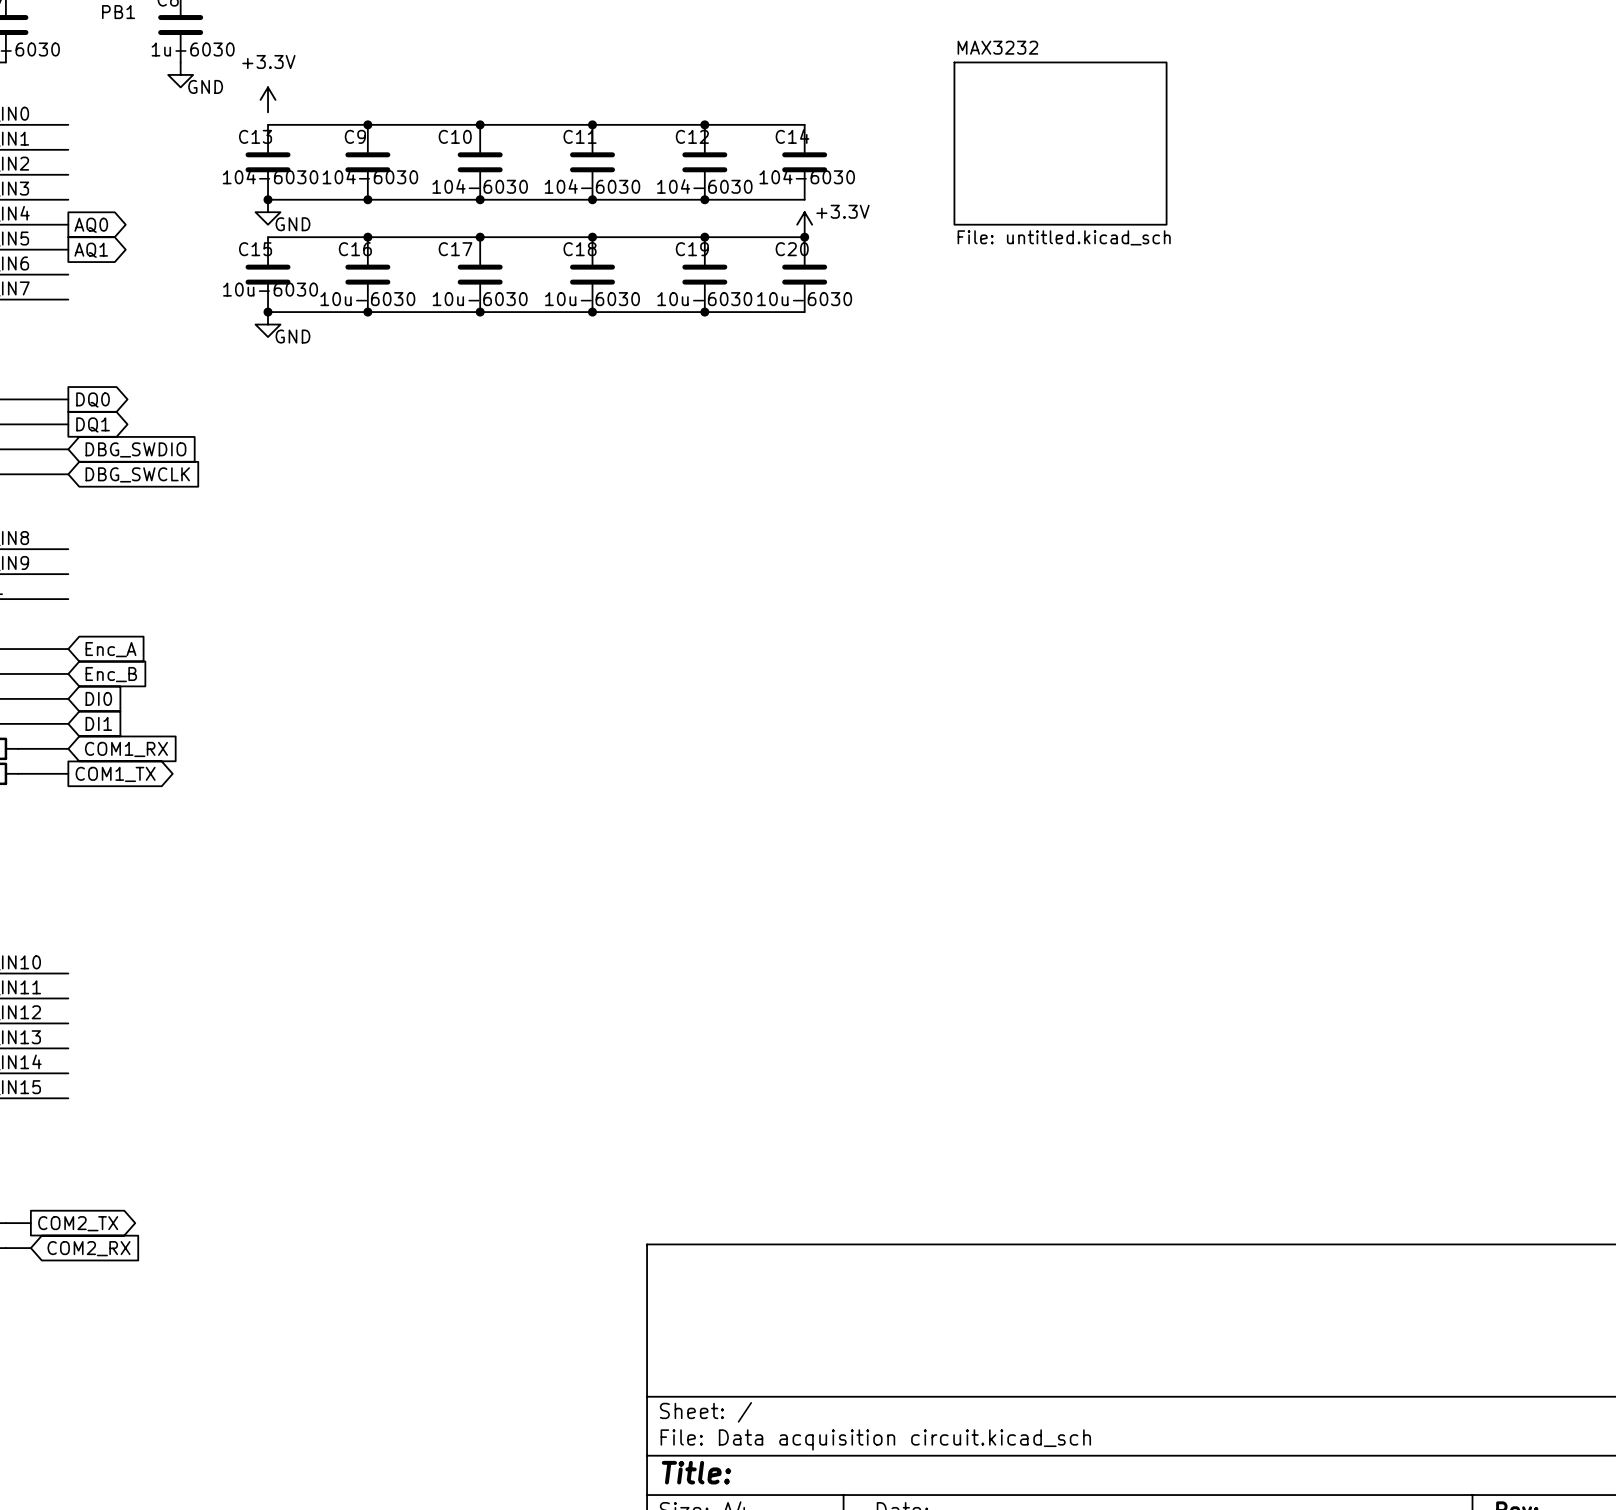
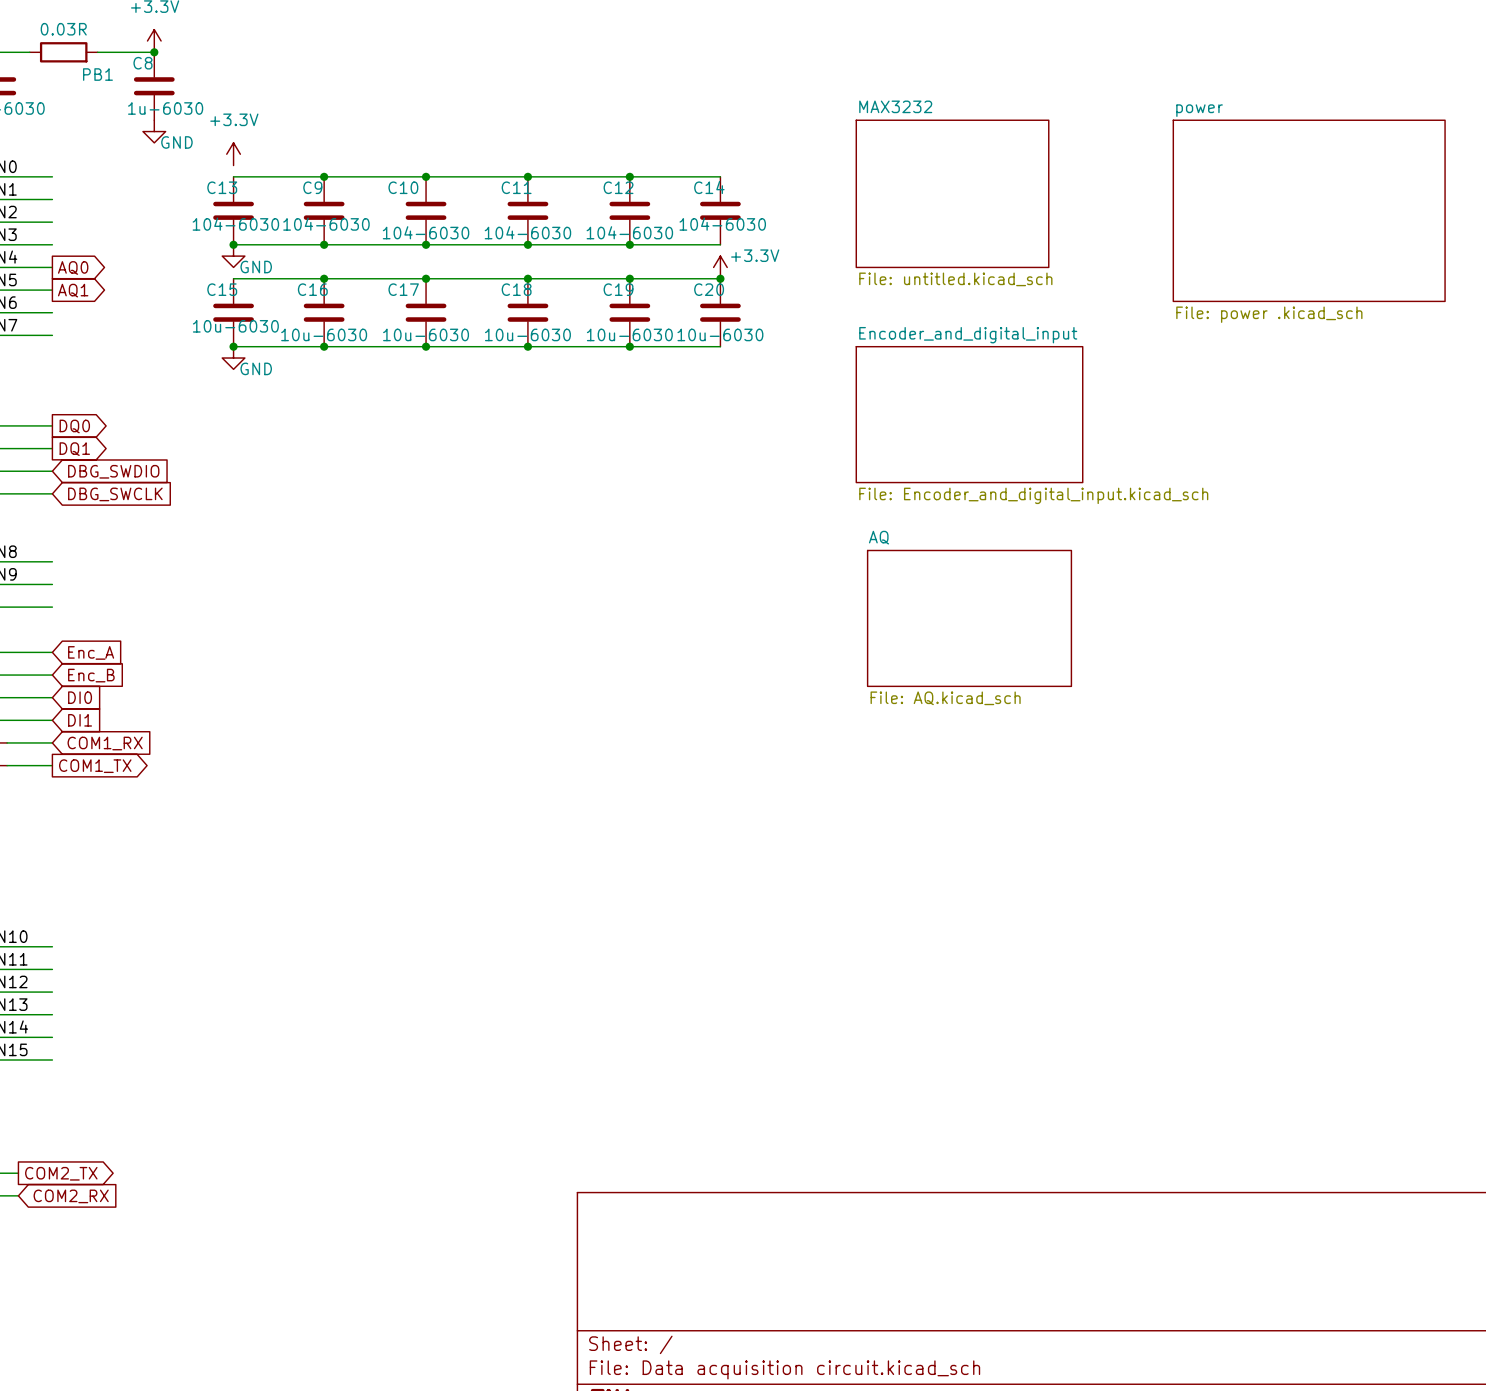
sheet power: none -> File: power .kicad_sch (1309, 210)
sheet Encoder_and_digital_input: none -> File: Encoder_and_digital_input.kicad_sch (969, 414)
sheet AQ: none -> File: AQ.kicad_sch (969, 618)

